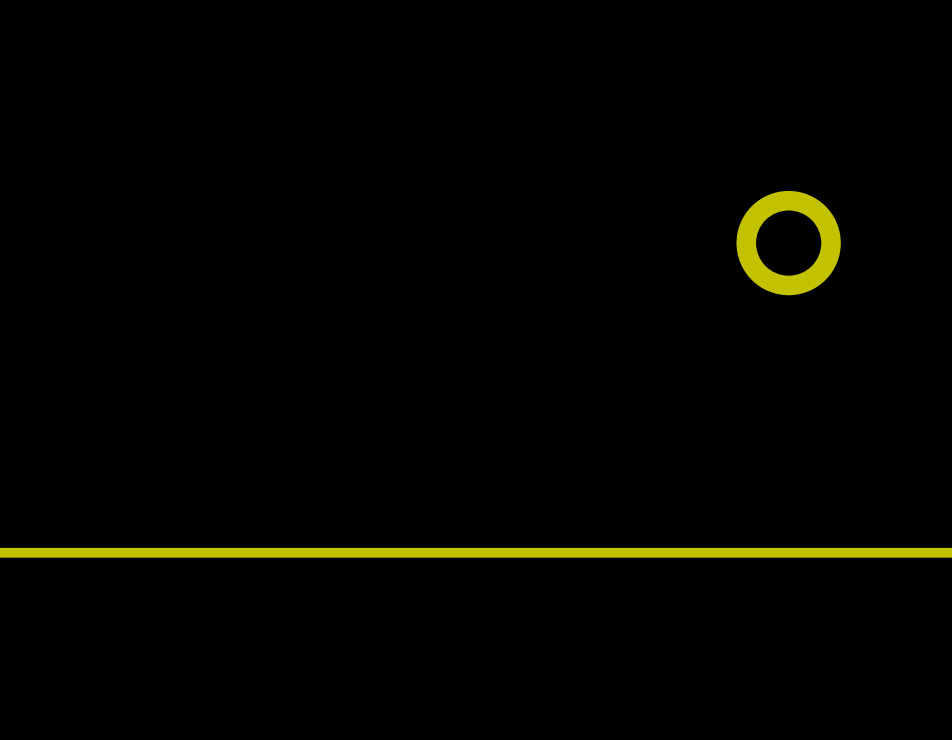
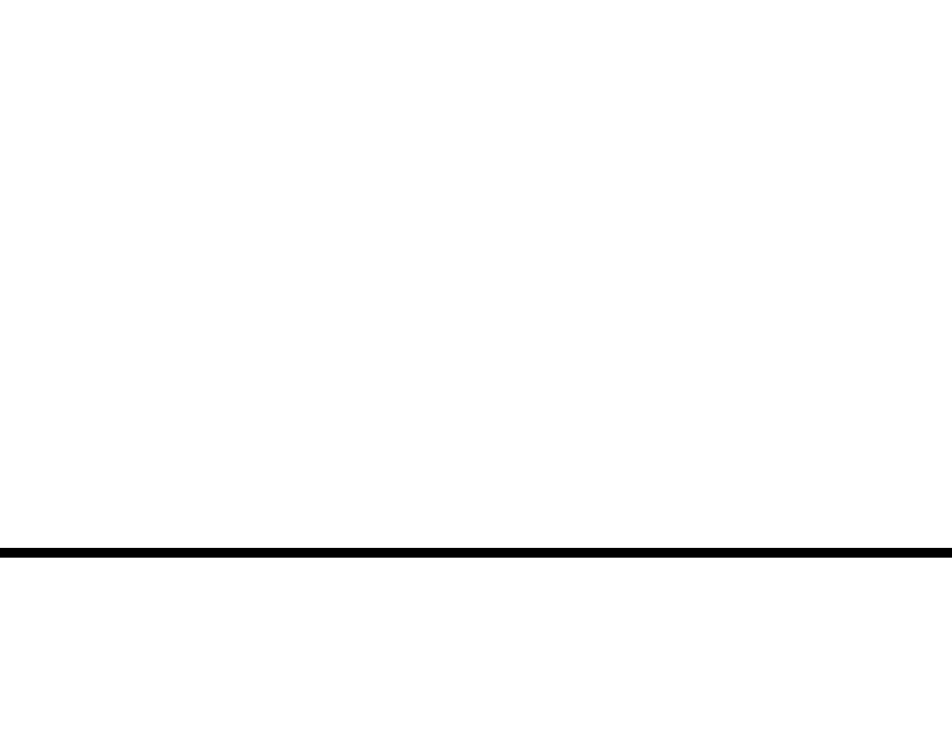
part: (788, 243) -> none

